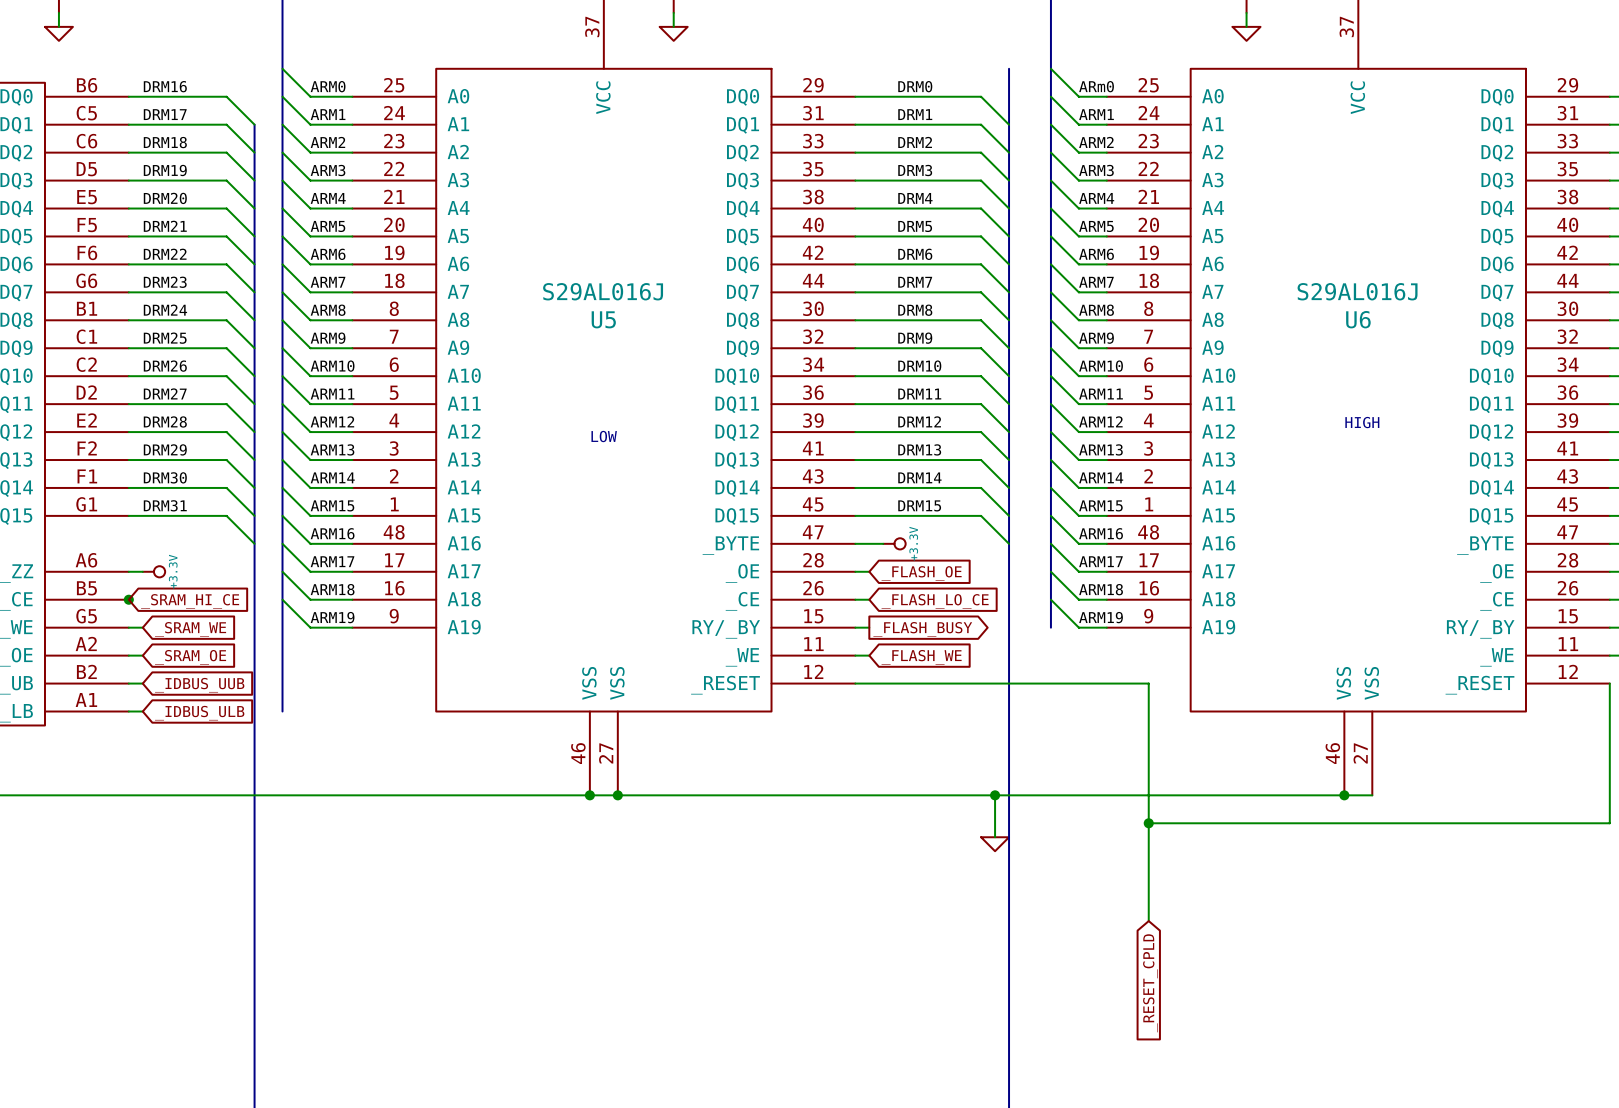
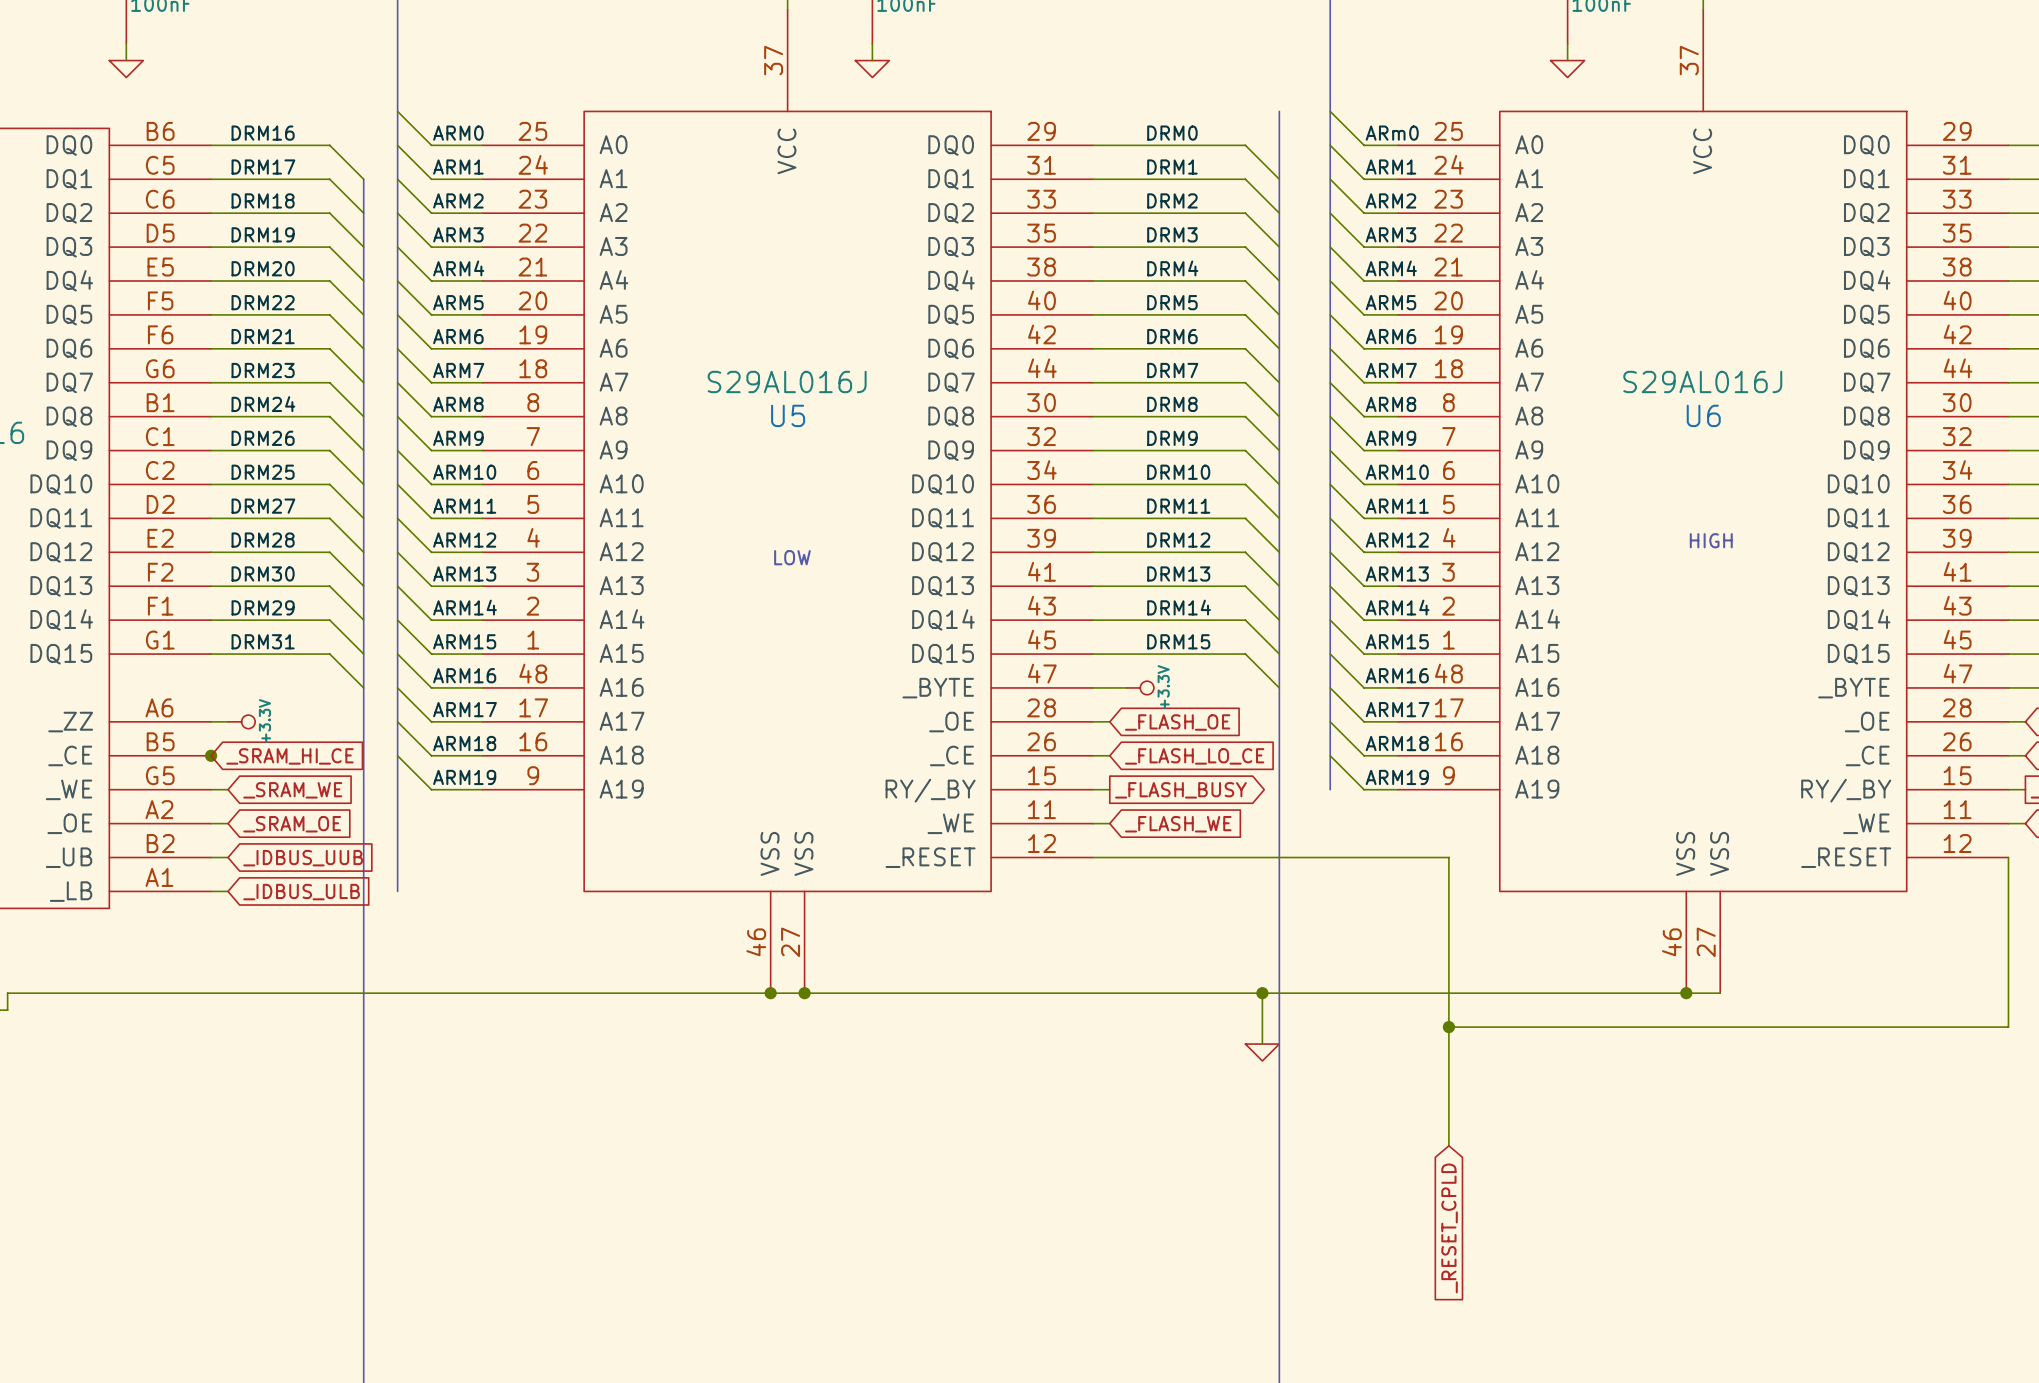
label: DRM21 (165, 226) -> DRM22 (263, 302)
label: DRM22 (165, 254) -> DRM21 (263, 336)
label: DRM25 (165, 338) -> DRM26 (263, 438)
label: DRM26 (165, 366) -> DRM25 (263, 472)
label: DRM29 (165, 449) -> DRM30 (263, 573)
label: DRM30 (165, 477) -> DRM29 (263, 607)

